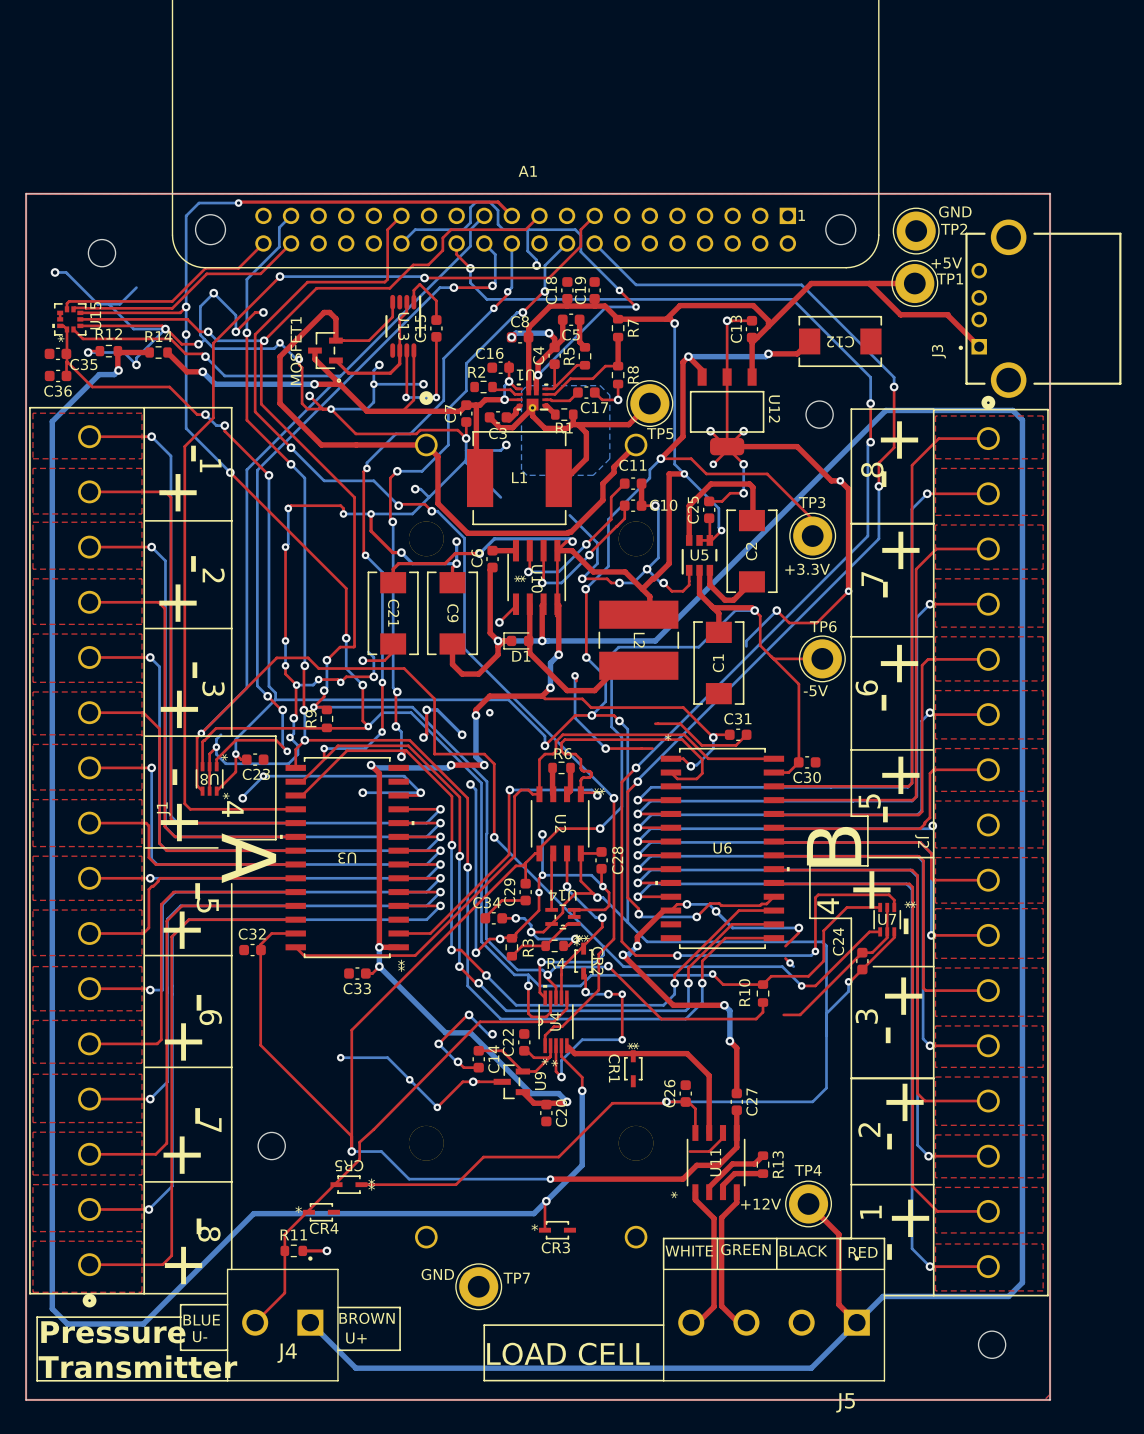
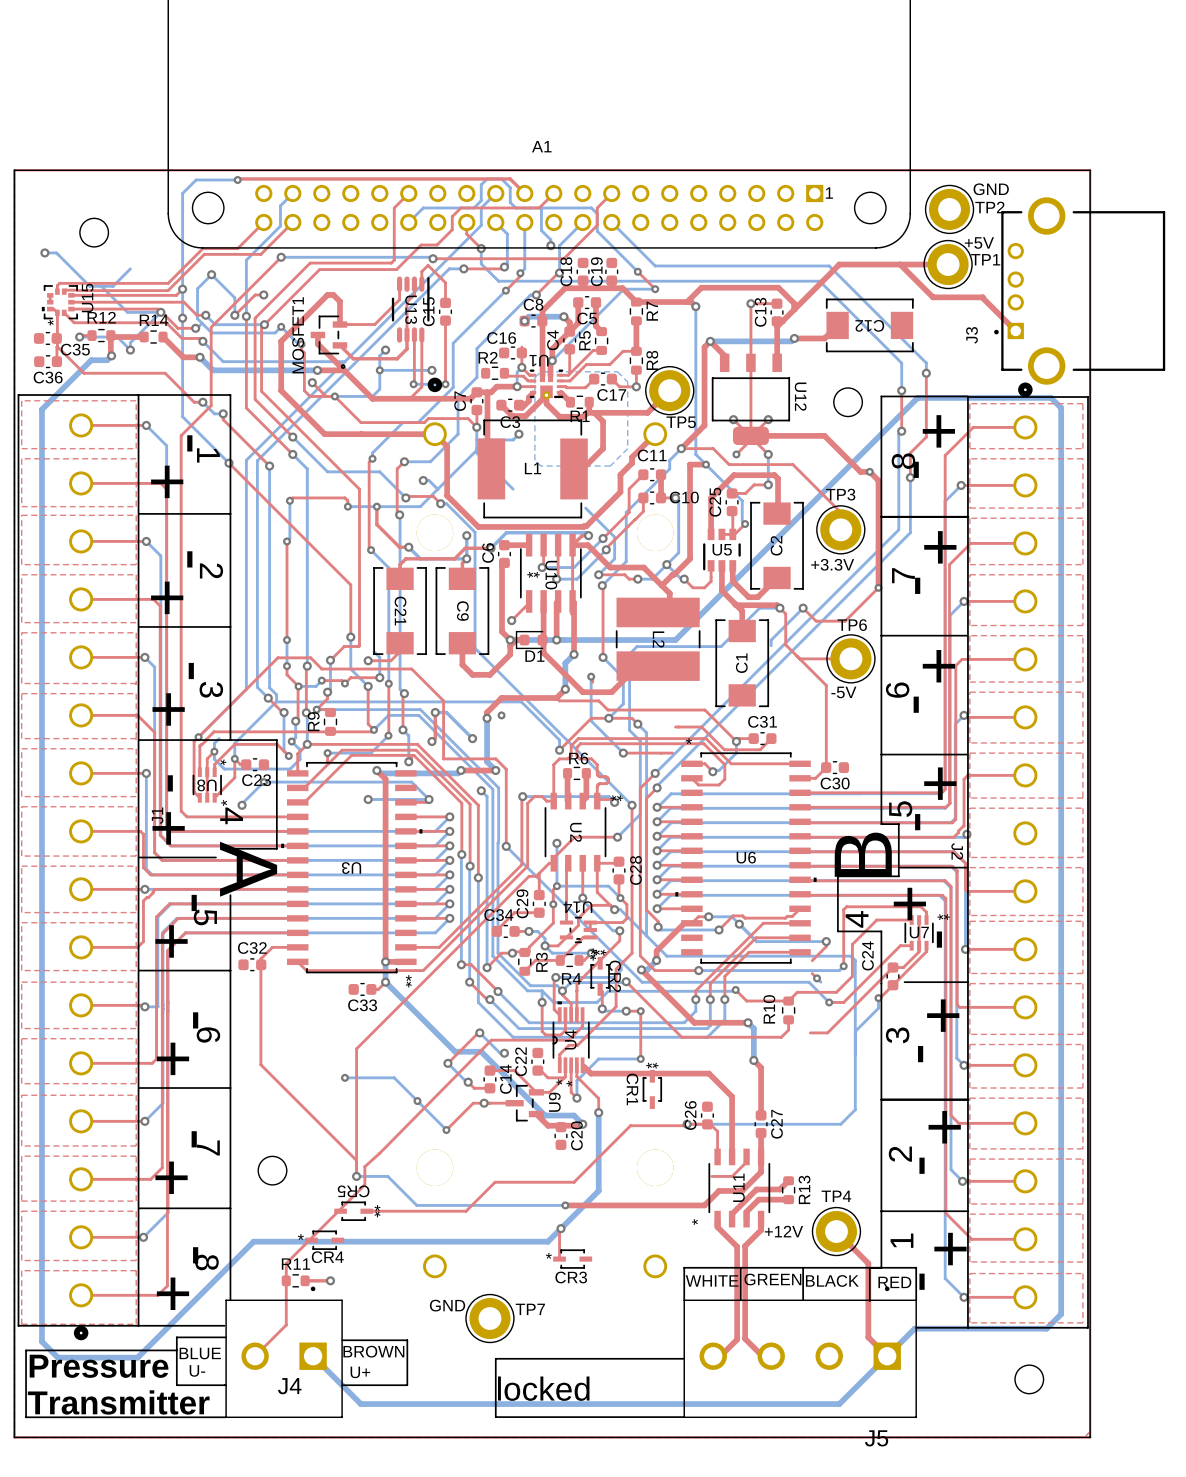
text: LOAD CELL (568, 1354) -> locked (543, 1388)

